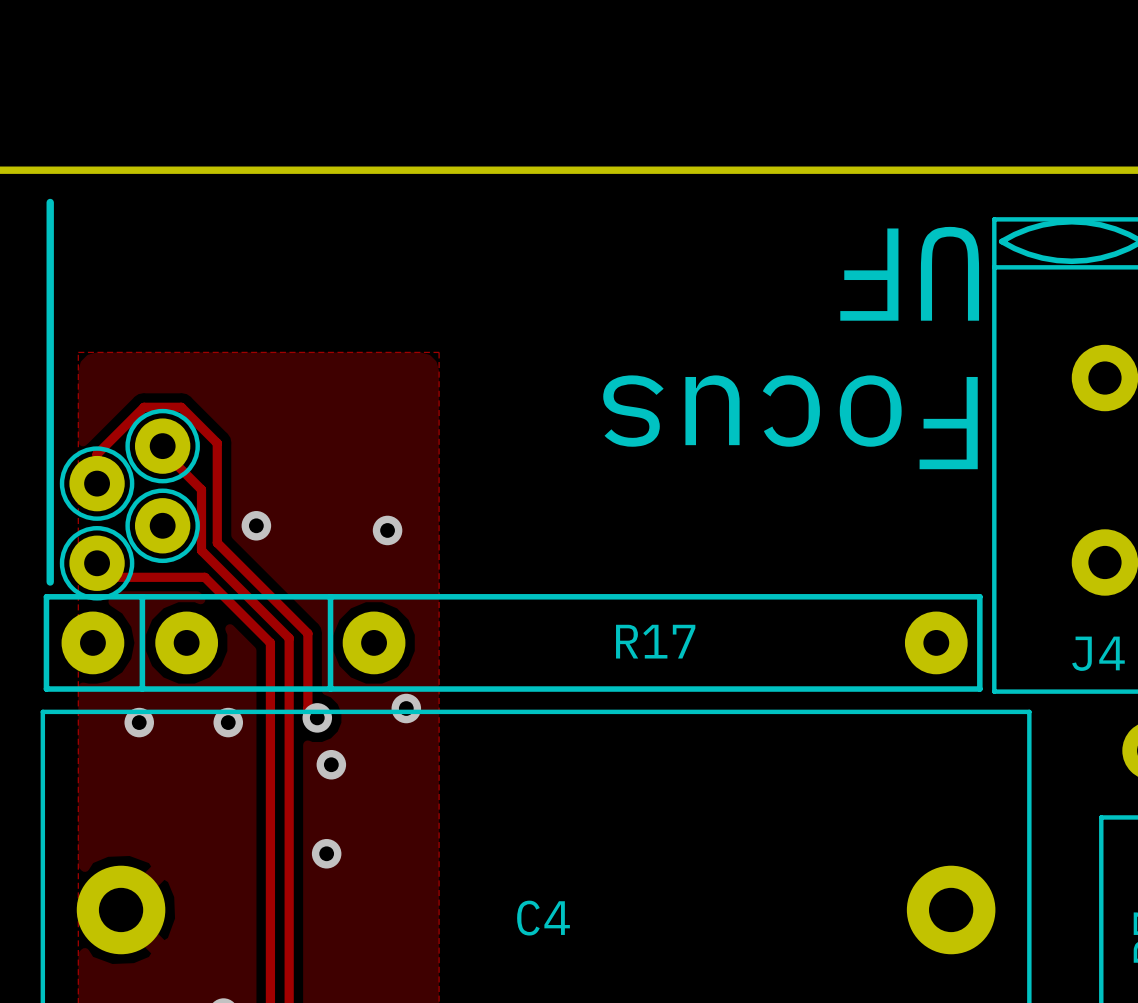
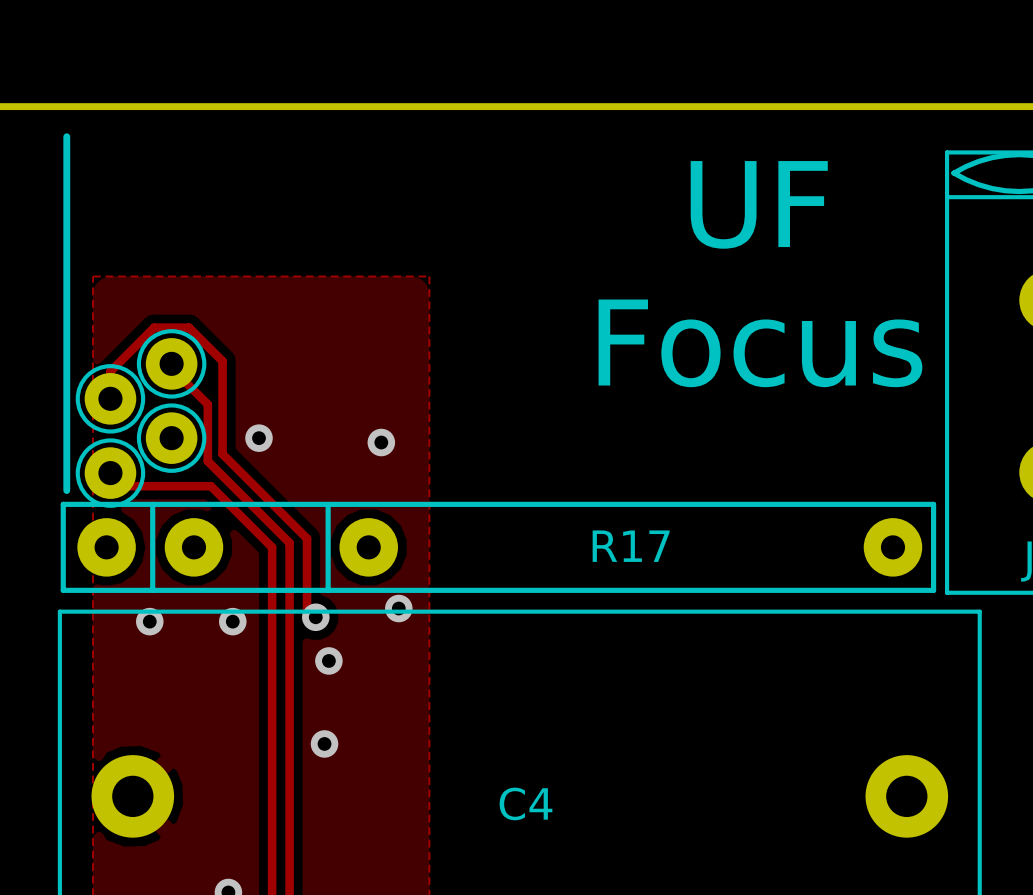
text rotation: 0° (909, 273) -> 180° (759, 204)
text rotation: 0° (790, 422) -> 180° (760, 343)

